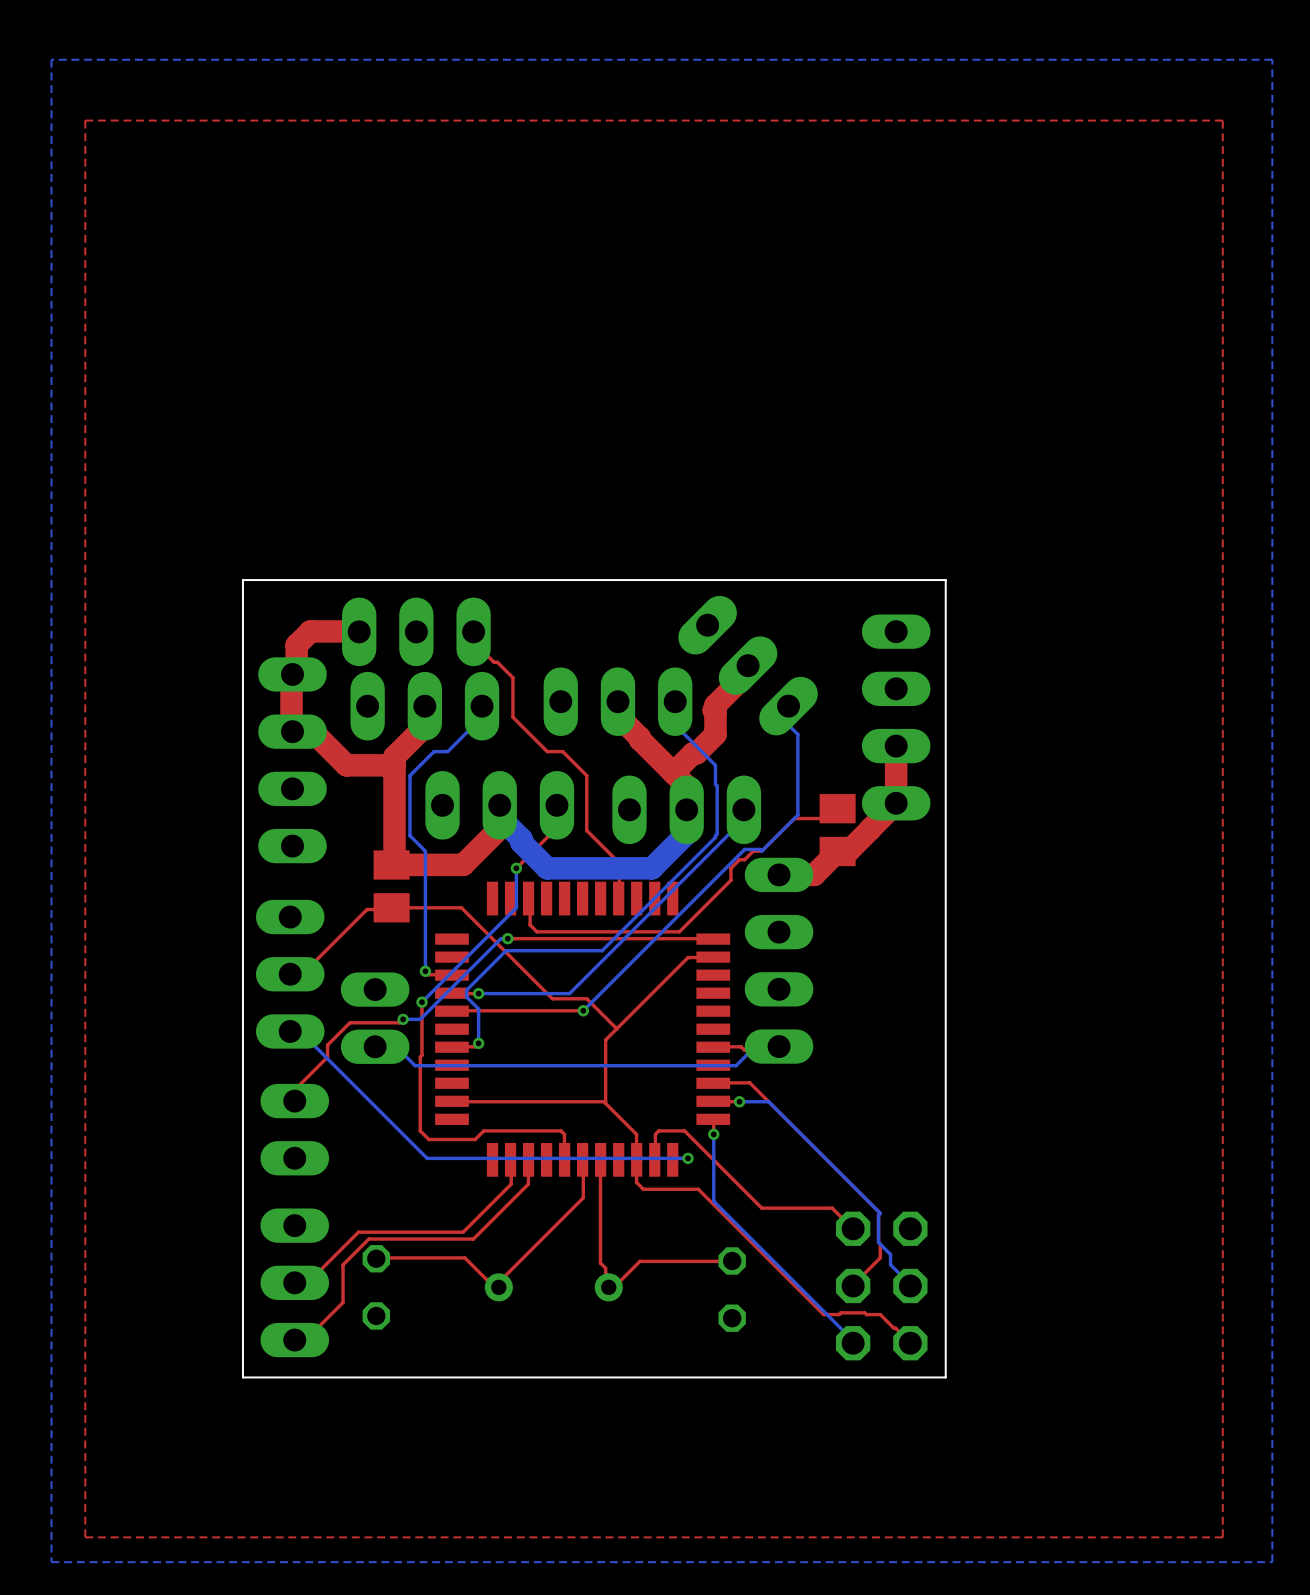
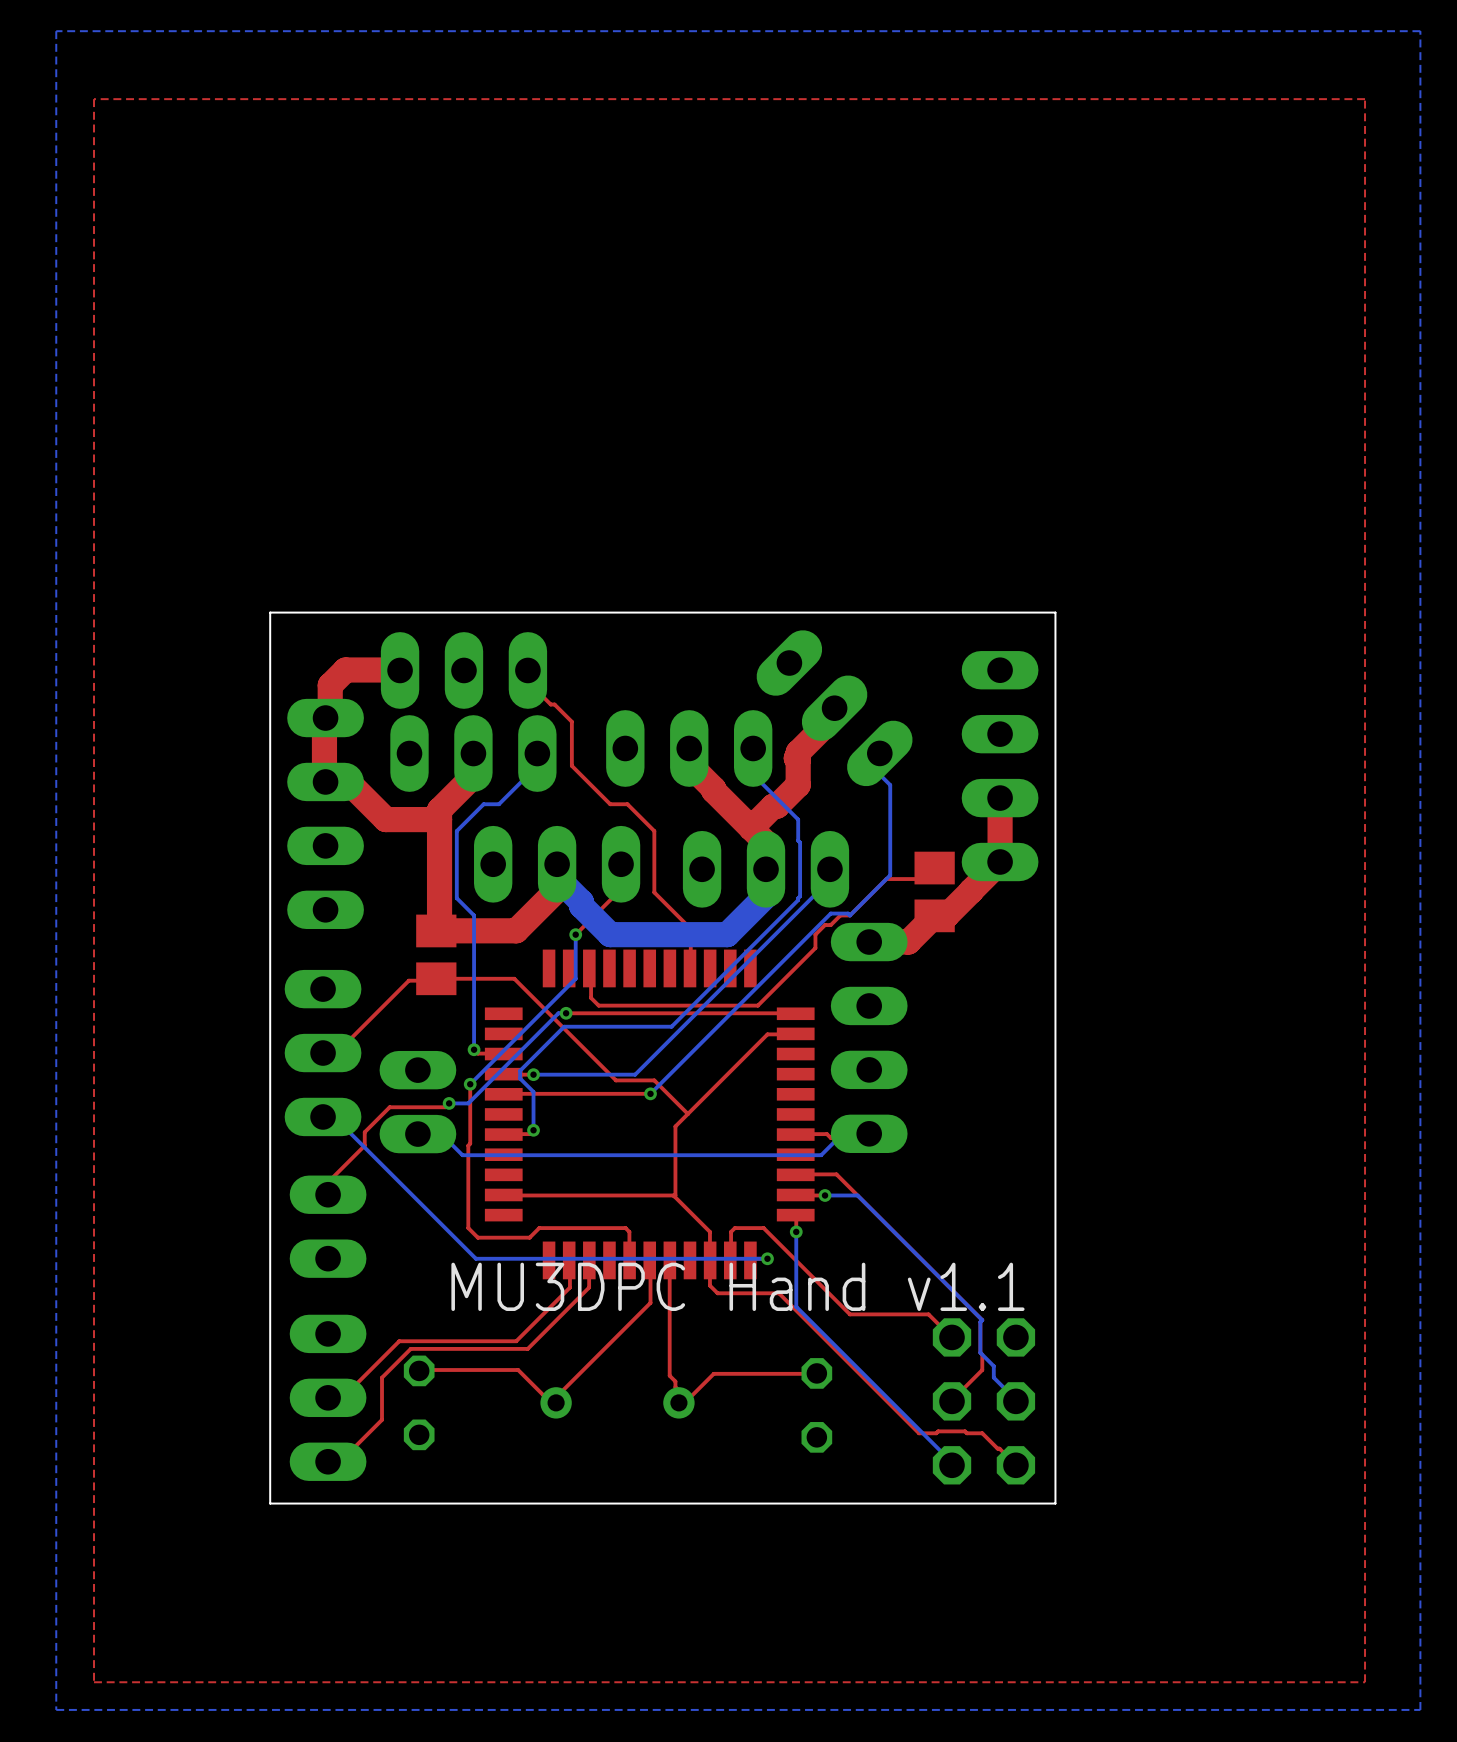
text: none -> MU3DPC Hand v1.1 (737, 1286)

